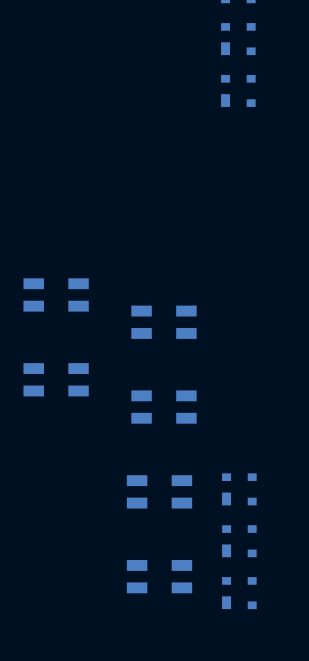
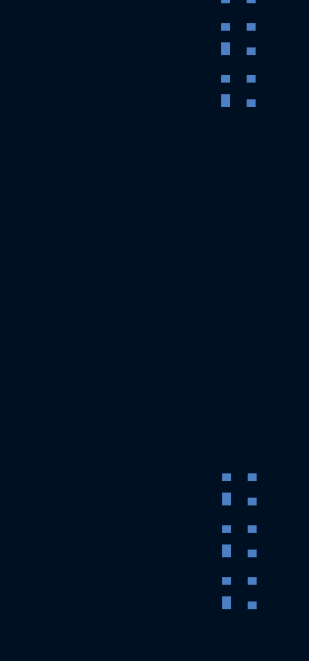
part: (56, 294) -> none
part: (163, 322) -> none
part: (56, 379) -> none
part: (163, 407) -> none
part: (159, 491) -> none
part: (159, 576) -> none

